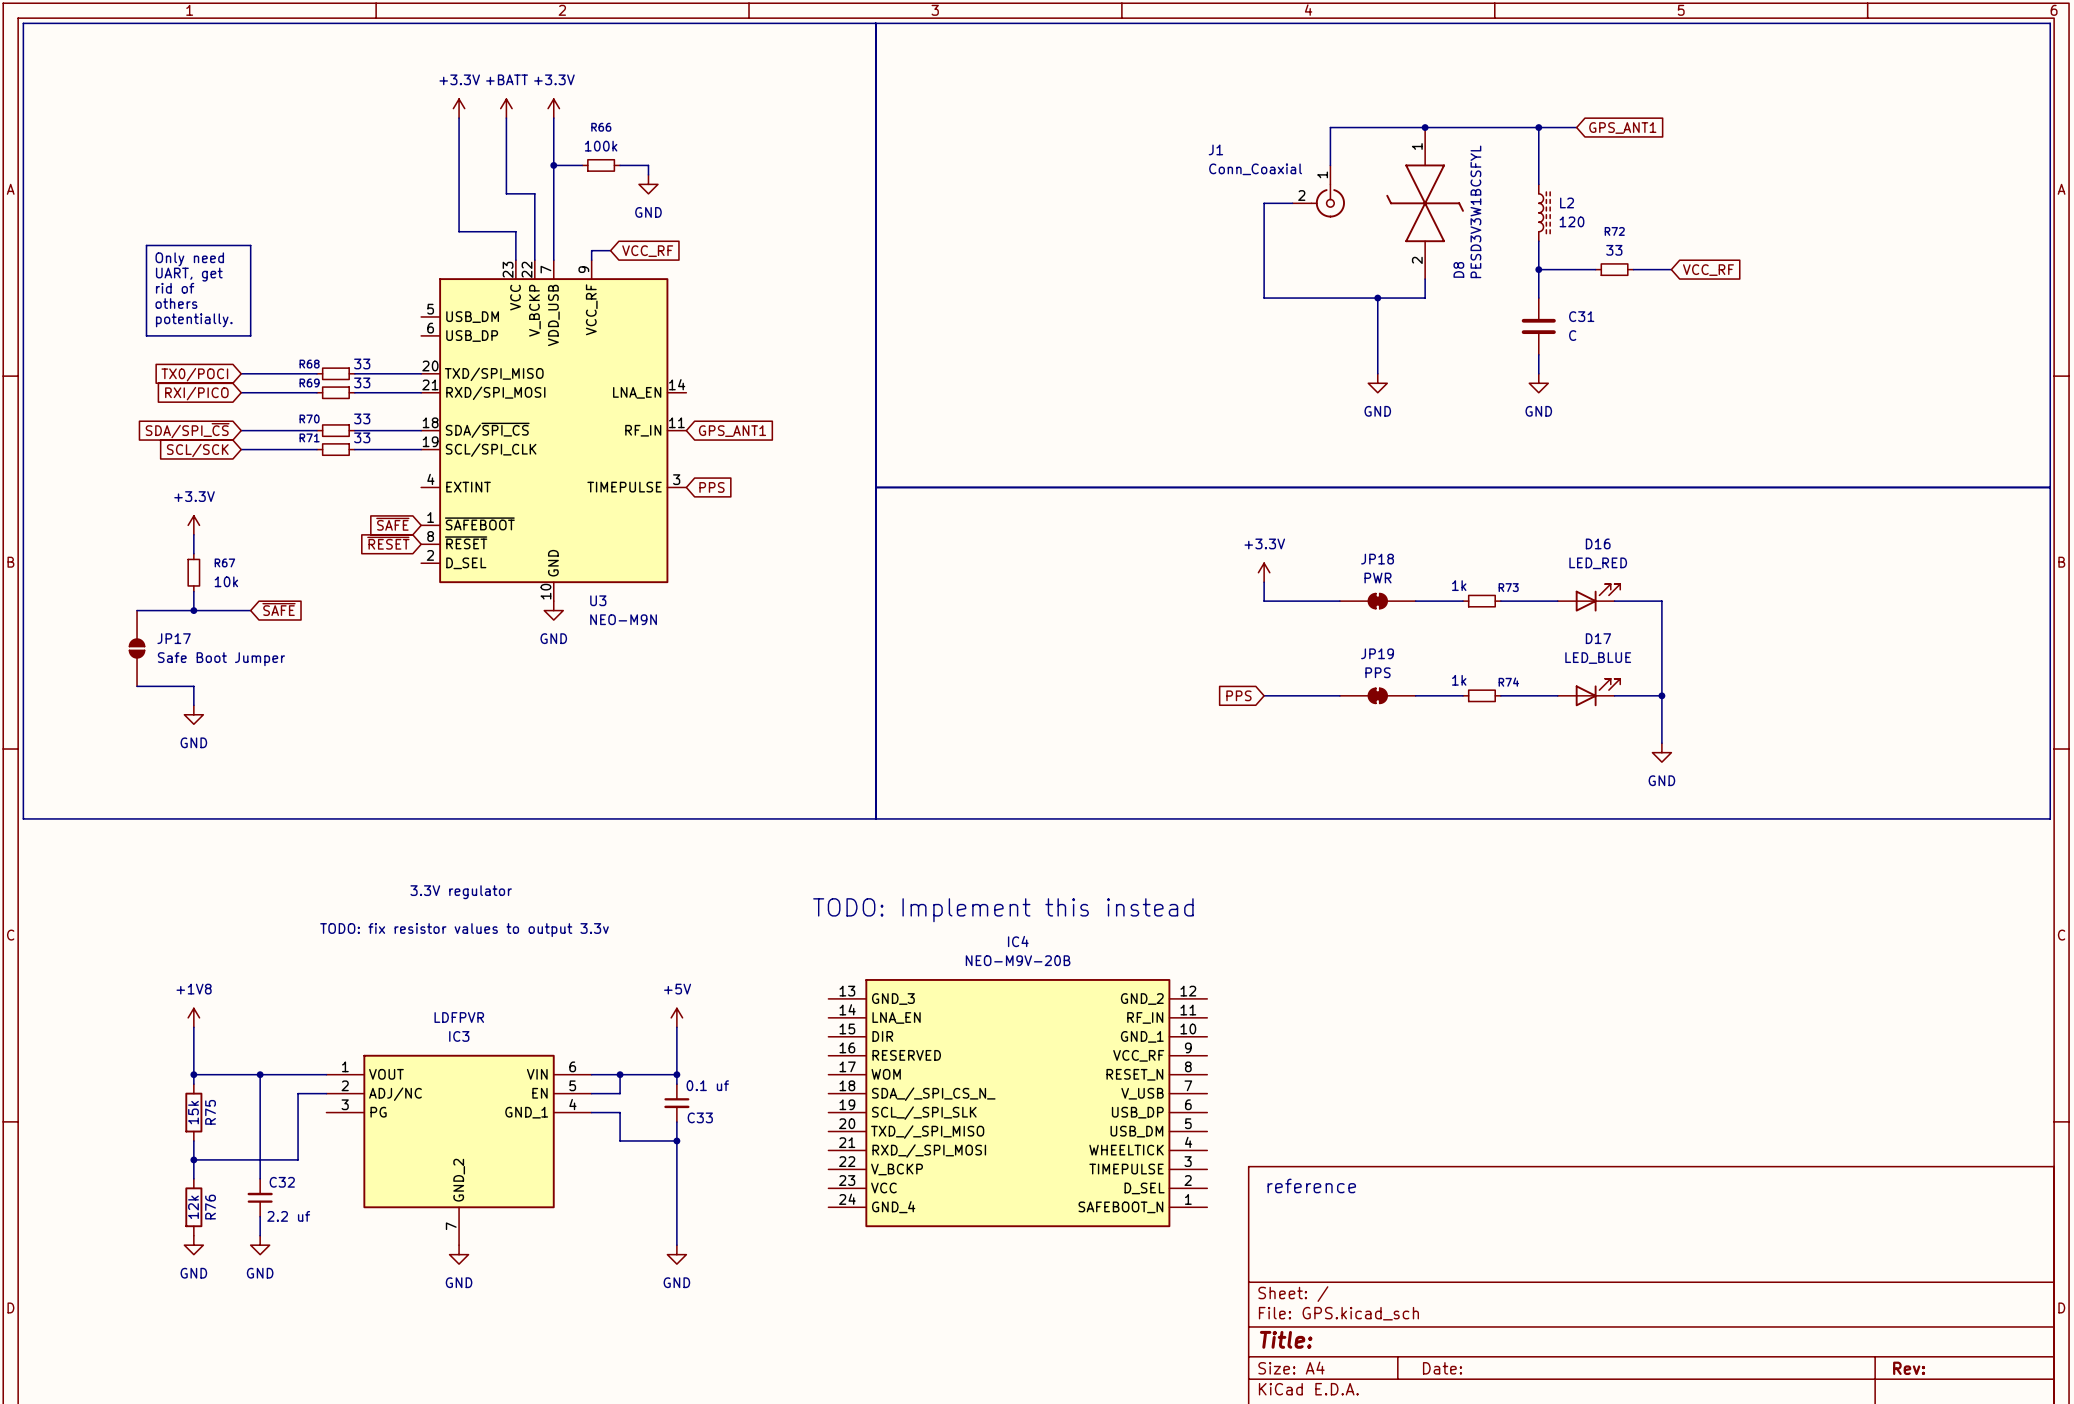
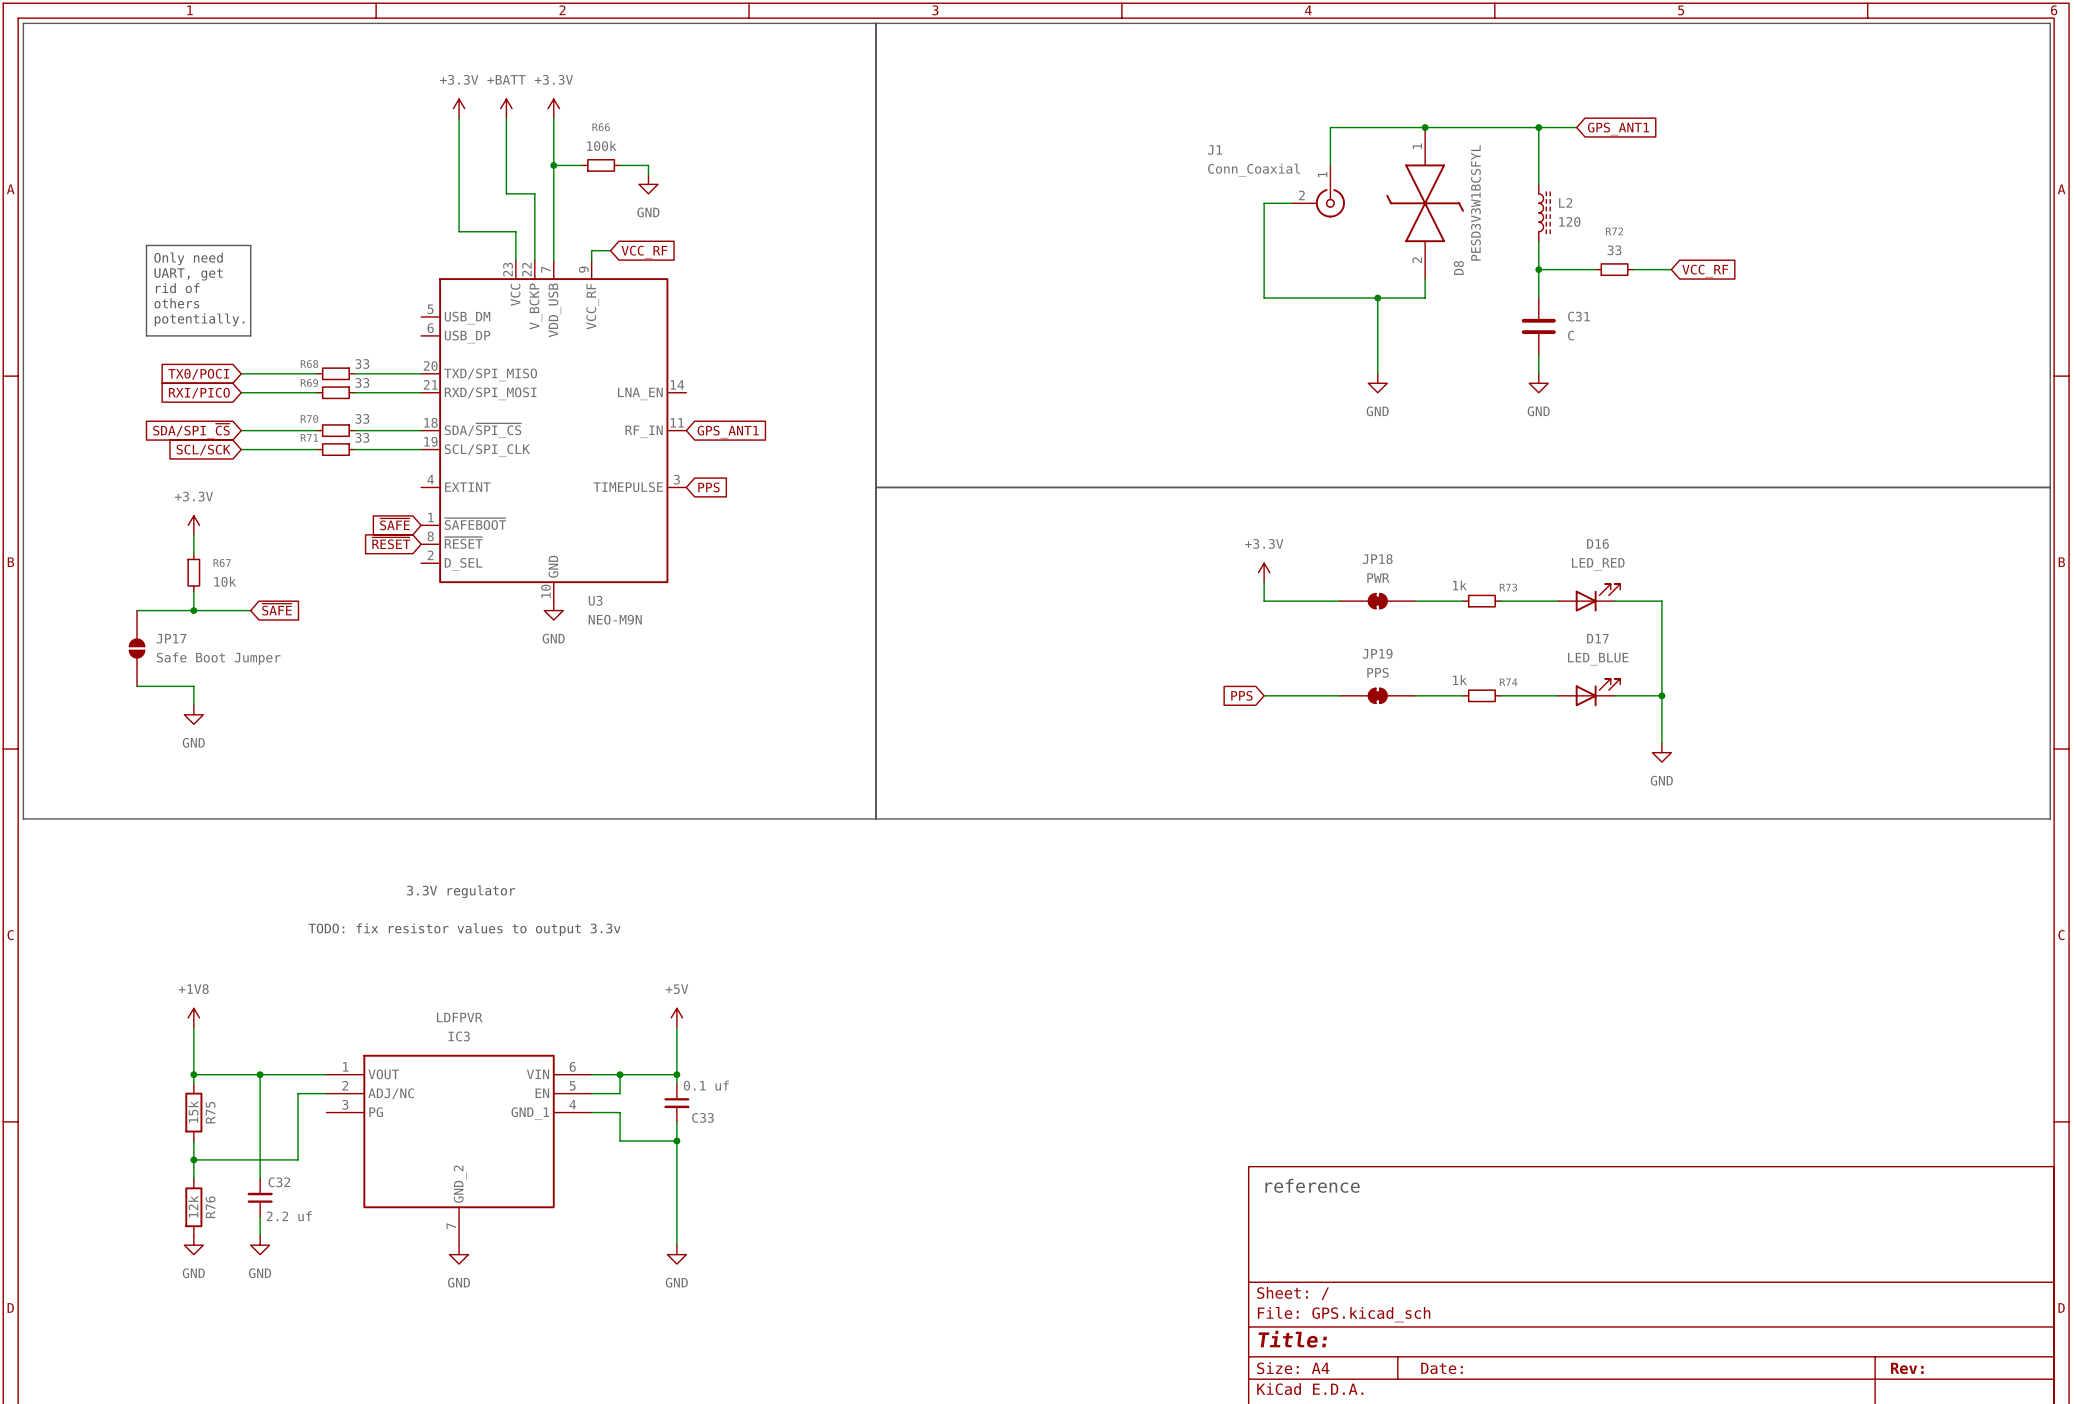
text: TODO: Implement this instead (1003, 910) -> none
IC4: NEO-M9V-20B (1017, 1103) -> none

